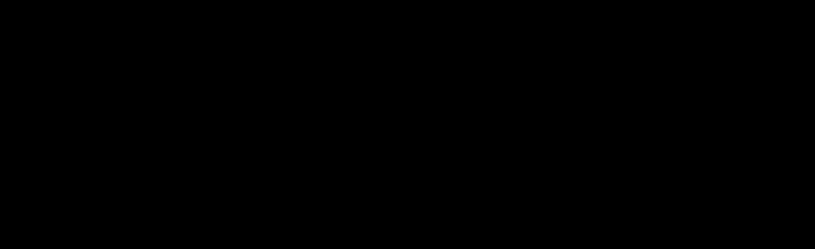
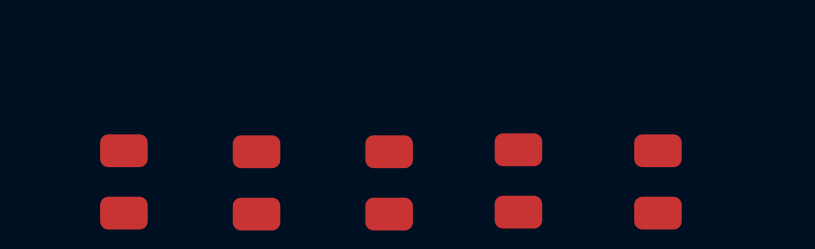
part: none -> (518, 180)
part: none -> (123, 181)
part: none -> (657, 181)
part: none -> (256, 182)
part: none -> (389, 182)

